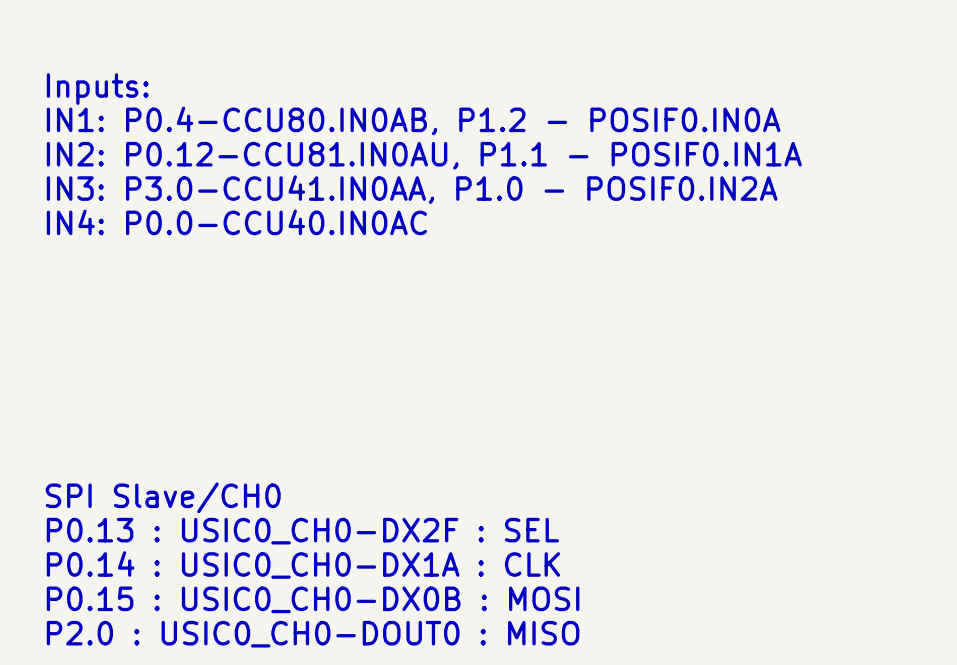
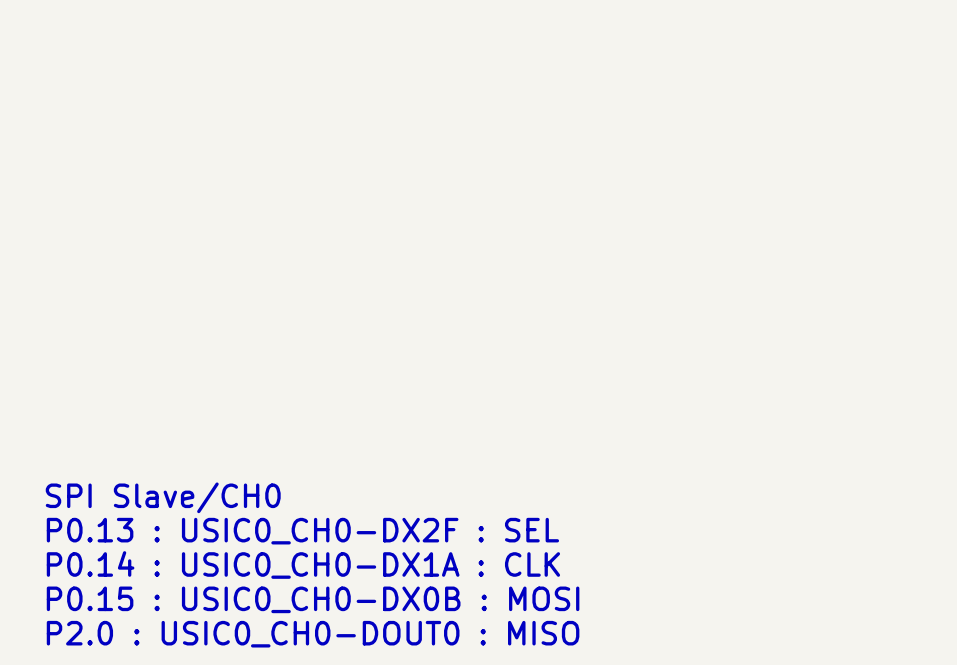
text: Inputs: (97, 89) -> none
text: IN1: P0.4-CCU80.IN0AB, P1.2 - POSIF0.IN0A (413, 120) -> none
text: IN2: P0.12-CCU81.IN0AU, P1.1 - POSIF0.IN1A (424, 155) -> none
text: IN3: P3.0-CCU41.IN0AA, P1.0 - POSIF0.IN2A (412, 189) -> none
text: IN4: P0.0-CCU40.IN0AC (236, 222) -> none

